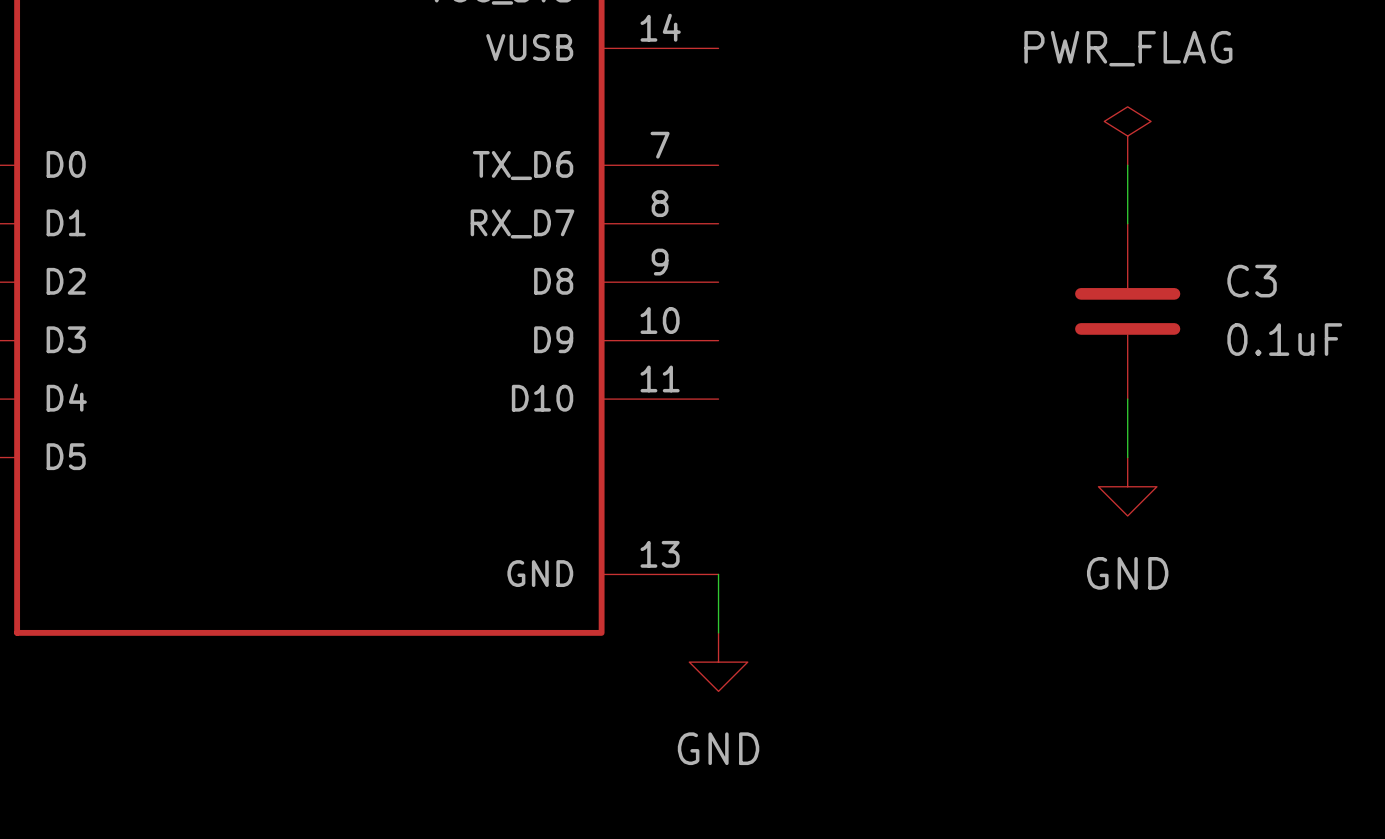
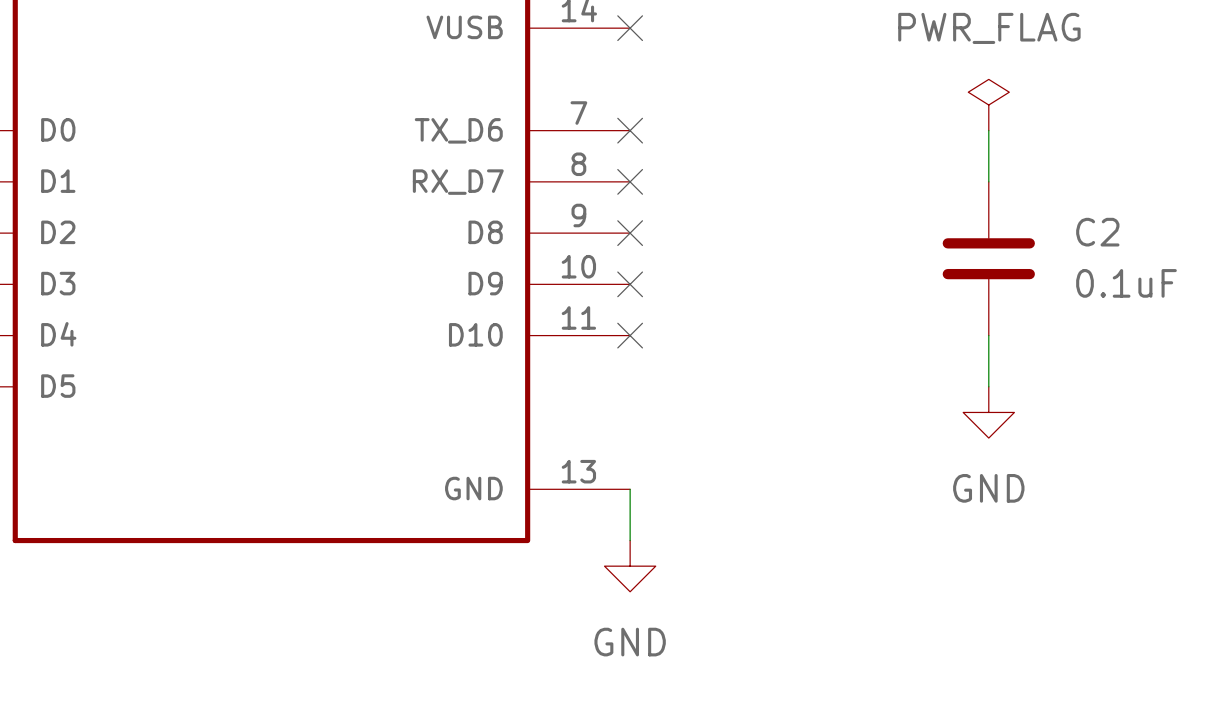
no-connect mark: none -> (630, 28)
no-connect mark: none -> (630, 130)
no-connect mark: none -> (630, 181)
C3 name: C3 (1252, 281) -> C2 (1097, 232)
no-connect mark: none -> (630, 233)
no-connect mark: none -> (630, 284)
no-connect mark: none -> (630, 335)

